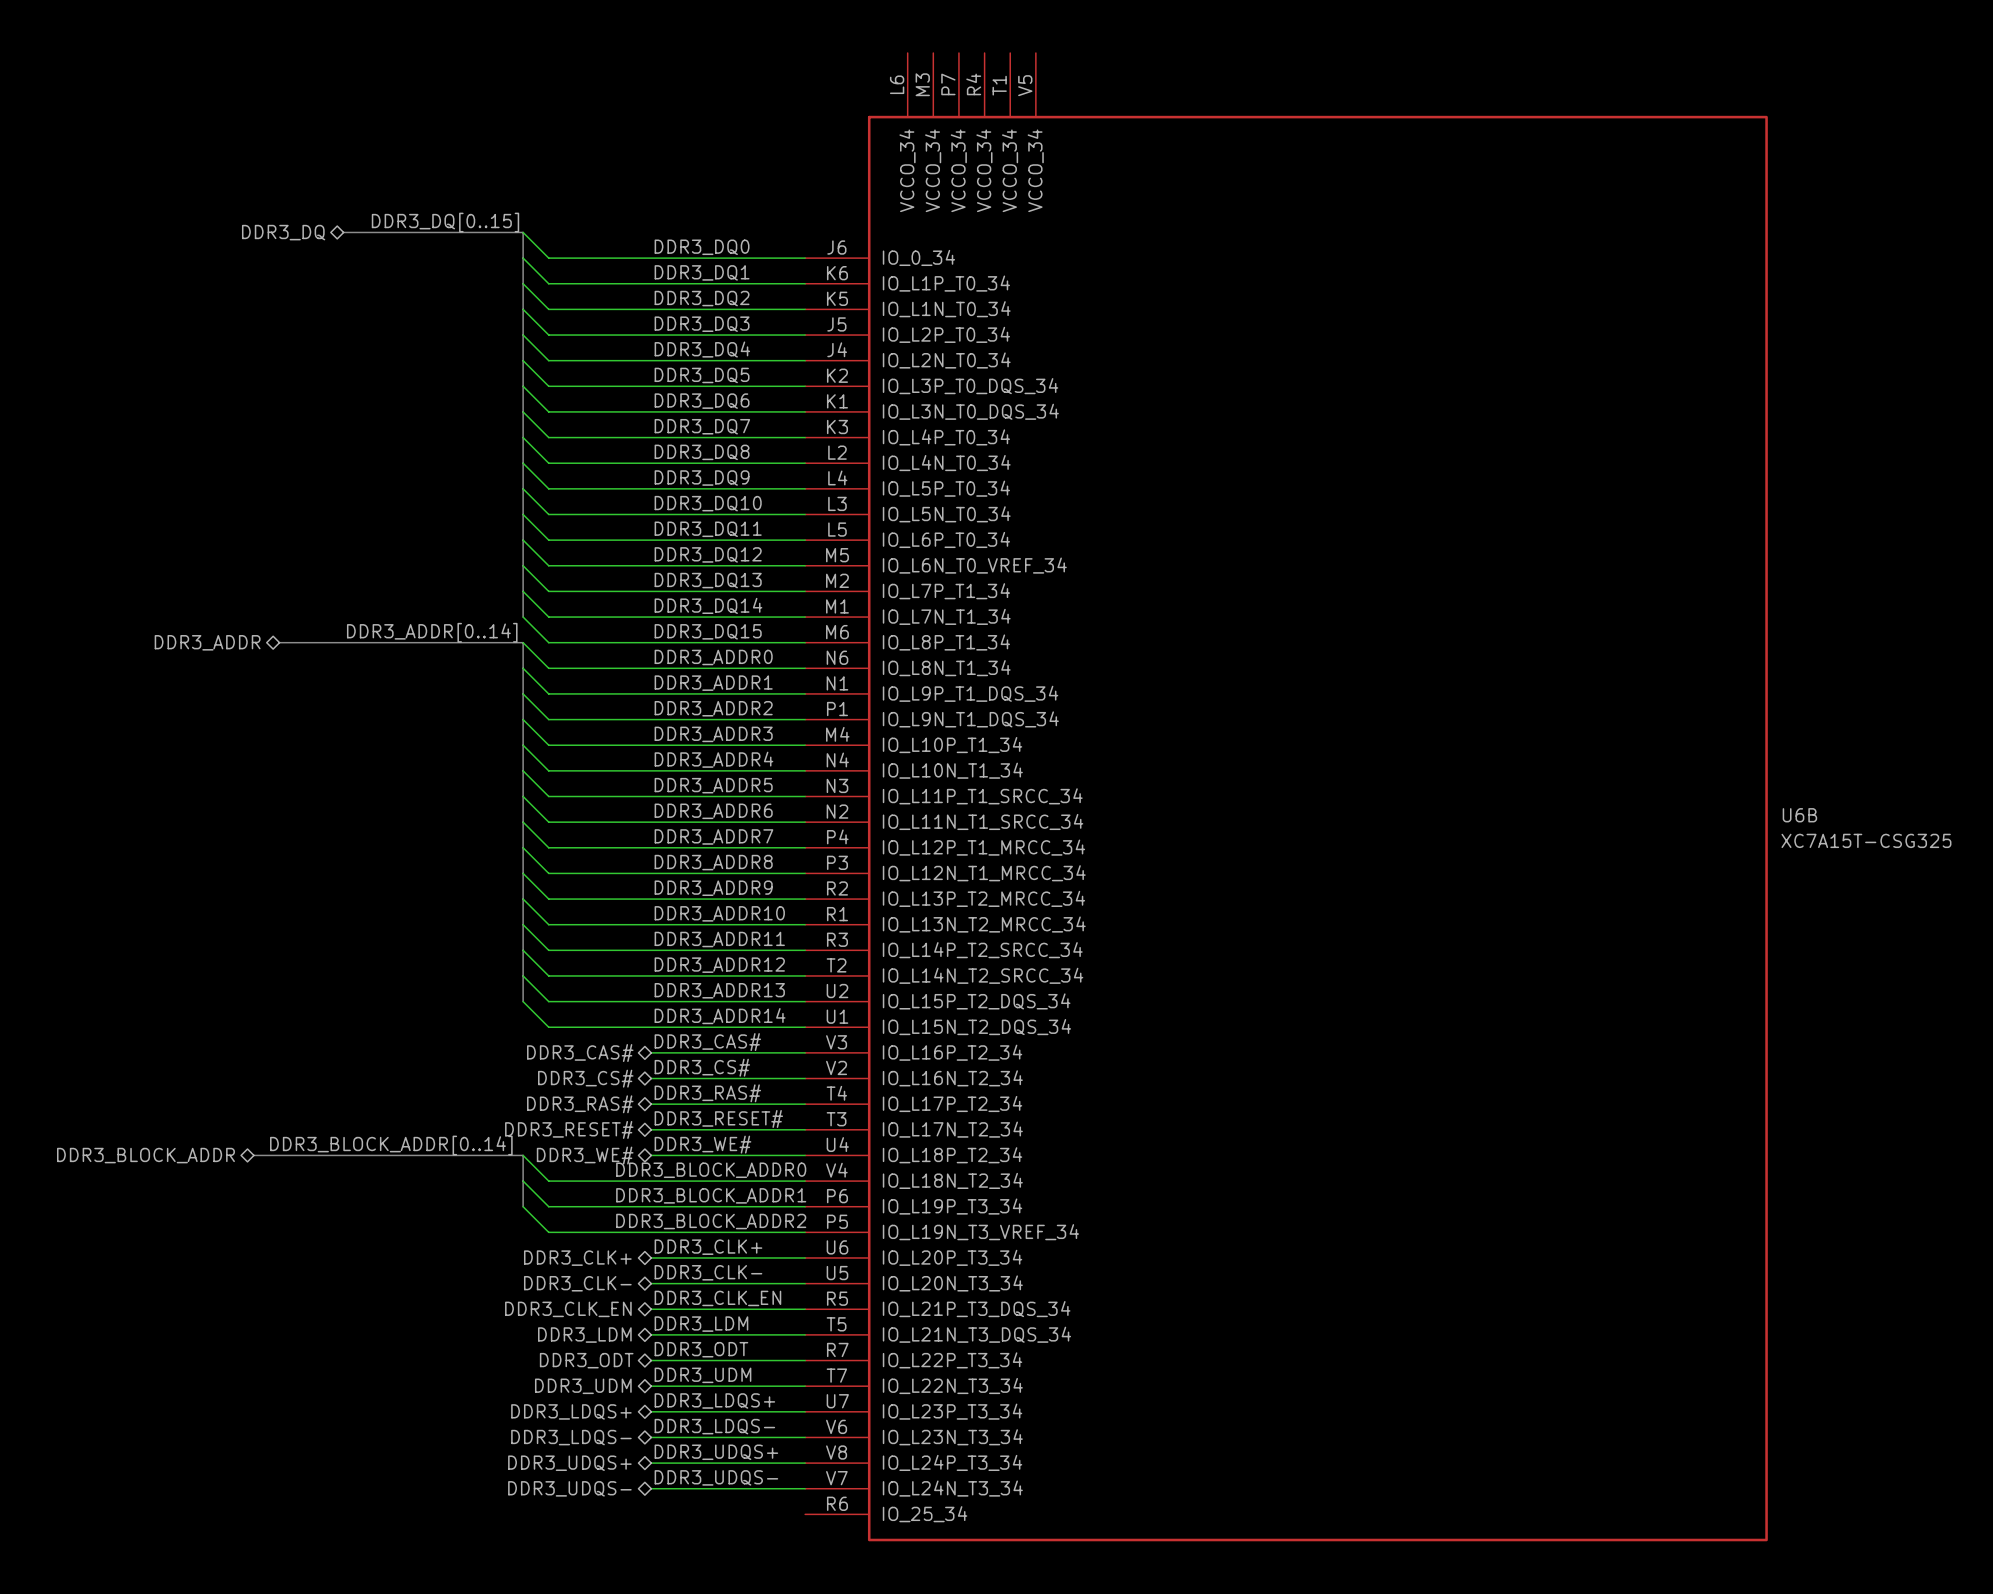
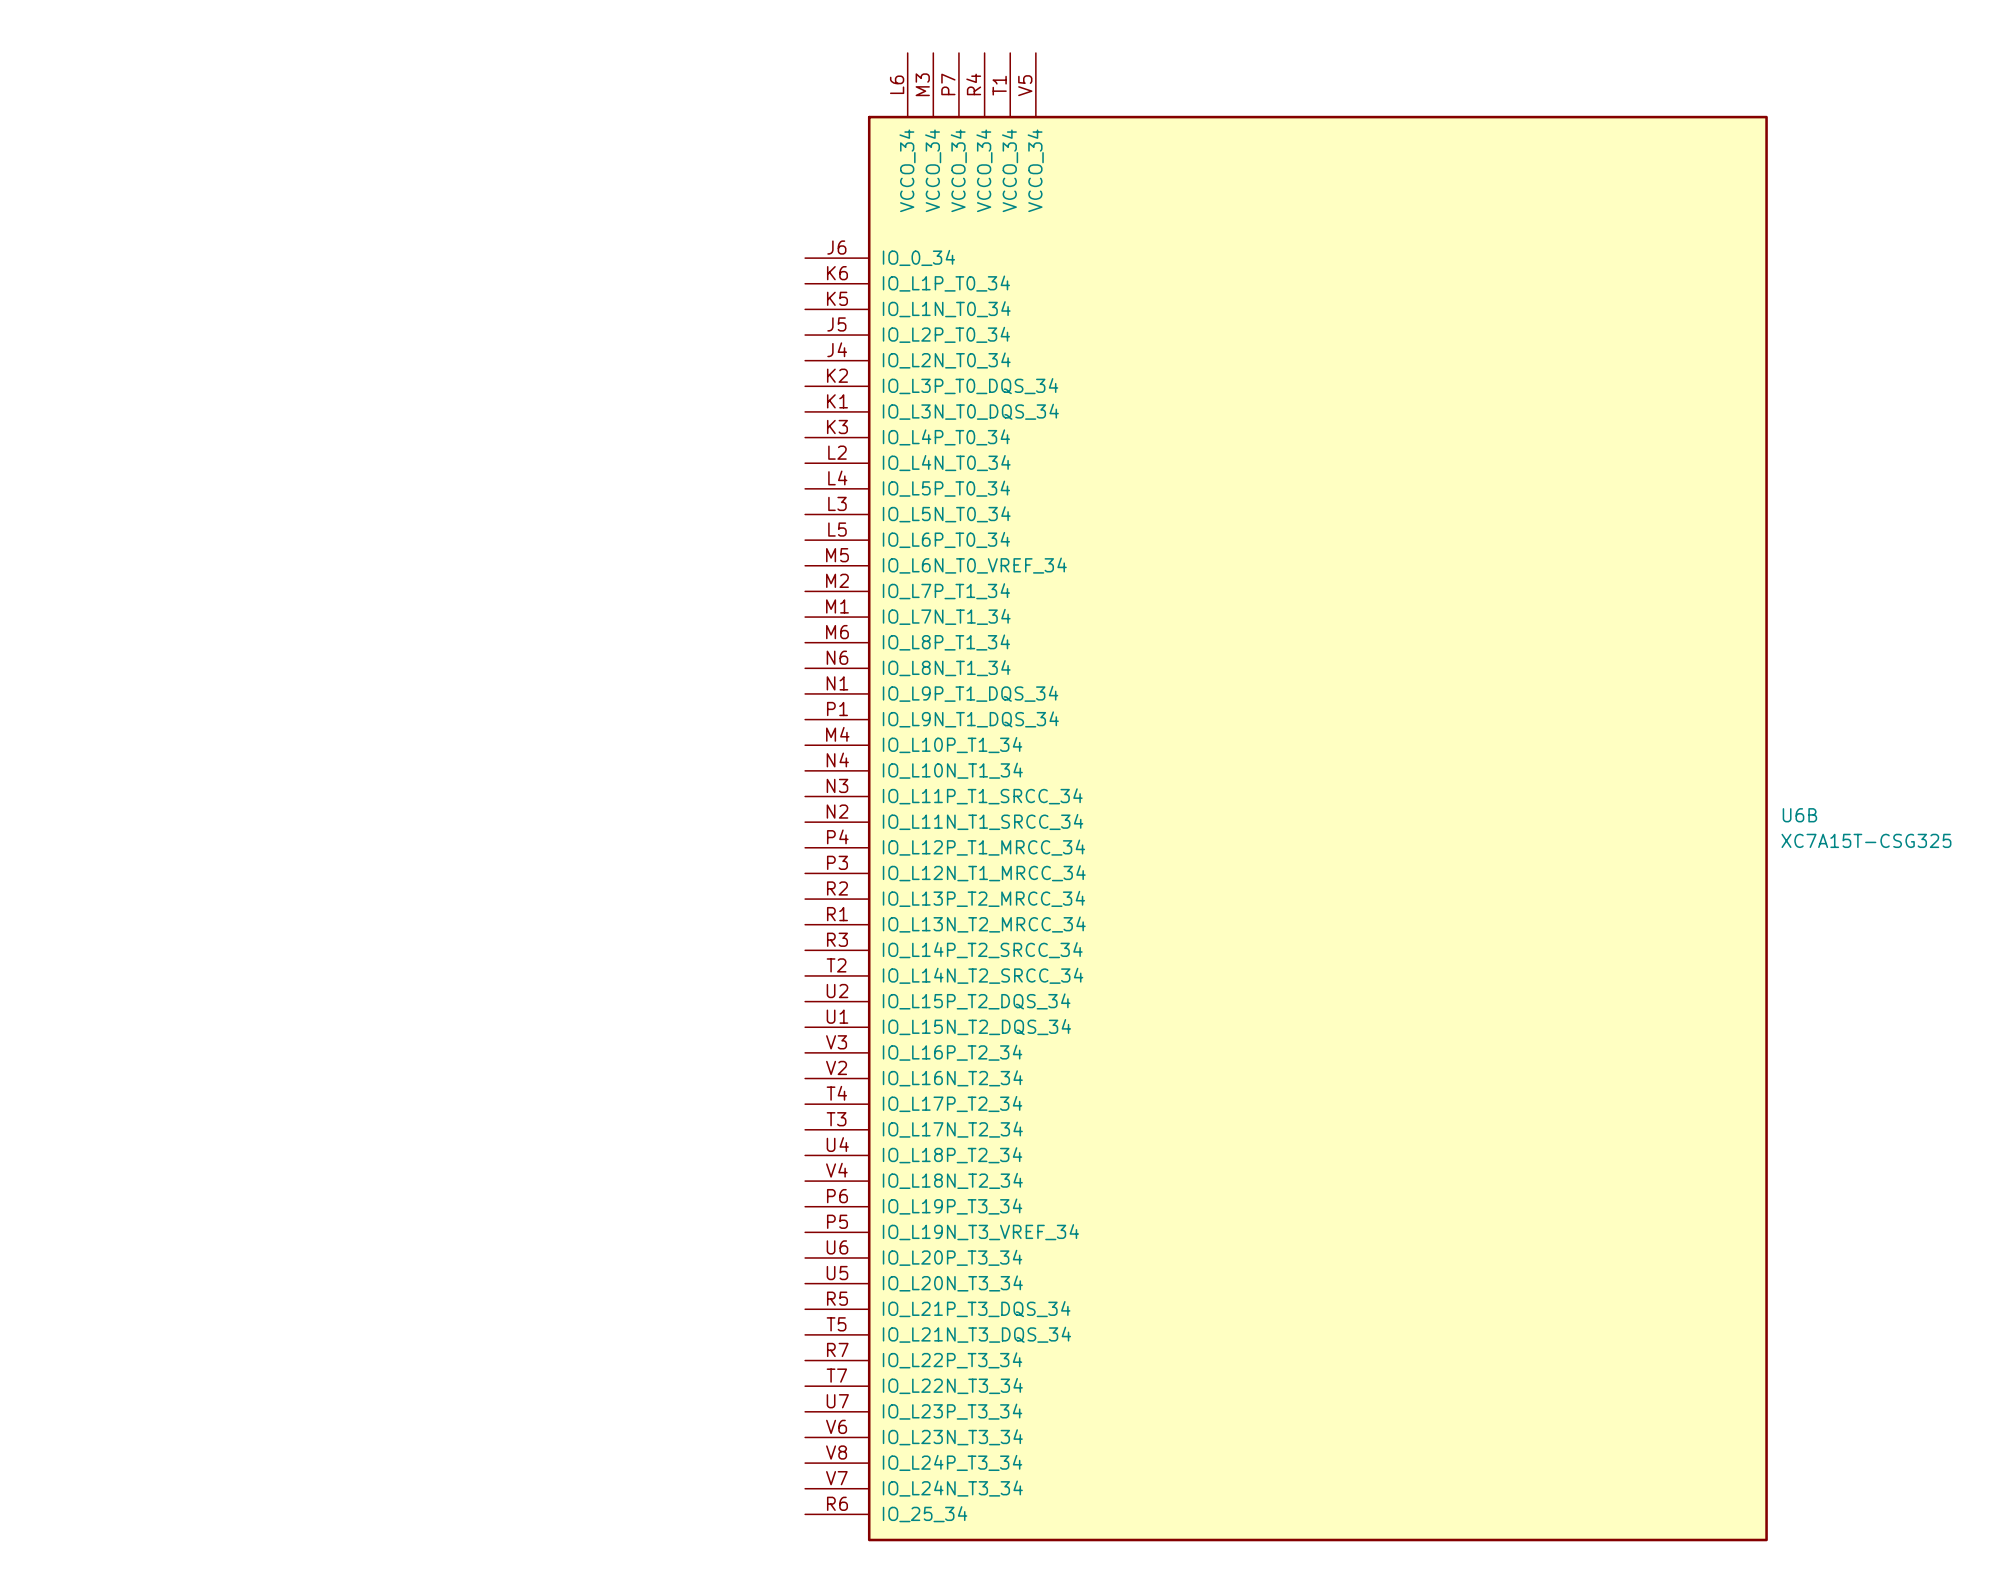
label: DDR3_DQ[0..15] (445, 222) -> none
hierarchical label: DDR3_DQ (283, 232) -> none
bus: (343, 232) (523, 232) (523, 617) -> none
wire: (523, 232) (548, 258) (805, 258) -> none
label: DDR3_DQ0 (702, 247) -> none
wire: (523, 258) (548, 283) (805, 283) -> none
label: DDR3_DQ1 (702, 272) -> none
wire: (523, 283) (548, 309) (805, 309) -> none
label: DDR3_DQ2 (702, 298) -> none
wire: (523, 309) (548, 335) (805, 335) -> none
label: DDR3_DQ3 (702, 324) -> none
wire: (523, 335) (548, 360) (805, 360) -> none
label: DDR3_DQ4 (702, 349) -> none
wire: (523, 360) (548, 386) (805, 386) -> none
label: DDR3_DQ5 (702, 375) -> none
wire: (523, 386) (548, 411) (805, 411) -> none
label: DDR3_DQ6 (702, 401) -> none
wire: (523, 411) (548, 437) (805, 437) -> none
label: DDR3_DQ7 (702, 426) -> none
wire: (523, 437) (548, 463) (805, 463) -> none
label: DDR3_DQ8 (702, 452) -> none
wire: (523, 463) (548, 488) (805, 488) -> none
label: DDR3_DQ9 (702, 478) -> none
wire: (523, 488) (548, 514) (805, 514) -> none
label: DDR3_DQ10 (708, 503) -> none
wire: (523, 514) (548, 540) (805, 540) -> none
label: DDR3_DQ11 (708, 529) -> none
wire: (523, 540) (548, 565) (805, 565) -> none
label: DDR3_DQ12 (708, 554) -> none
wire: (523, 565) (548, 591) (805, 591) -> none
label: DDR3_DQ13 (708, 580) -> none
wire: (523, 591) (548, 617) (805, 617) -> none
label: DDR3_DQ14 (708, 605) -> none
wire: (523, 617) (548, 642) (805, 642) -> none
label: DDR3_DQ15 (708, 631) -> none
label: DDR3_ADDR[0..14] (432, 632) -> none
hierarchical label: DDR3_ADDR (207, 642) -> none
bus: (279, 642) (523, 642) (523, 1001) -> none
wire: (523, 642) (548, 668) (805, 668) -> none
label: DDR3_ADDR0 (713, 657) -> none
wire: (523, 668) (548, 693) (805, 693) -> none
label: DDR3_ADDR1 (713, 683) -> none
wire: (523, 693) (548, 719) (805, 719) -> none
label: DDR3_ADDR2 (713, 708) -> none
wire: (523, 719) (548, 745) (805, 745) -> none
label: DDR3_ADDR3 (713, 734) -> none
wire: (523, 745) (548, 770) (805, 770) -> none
label: DDR3_ADDR4 (713, 759) -> none
wire: (523, 770) (548, 796) (805, 796) -> none
label: DDR3_ADDR5 (713, 785) -> none
wire: (523, 796) (548, 822) (805, 822) -> none
label: DDR3_ADDR6 (713, 811) -> none
wire: (523, 822) (548, 847) (805, 847) -> none
label: DDR3_ADDR7 (713, 836) -> none
wire: (523, 847) (548, 873) (805, 873) -> none
label: DDR3_ADDR8 (713, 862) -> none
wire: (523, 873) (548, 899) (805, 899) -> none
label: DDR3_ADDR9 (713, 888) -> none
wire: (523, 899) (548, 924) (805, 924) -> none
label: DDR3_ADDR10 (719, 913) -> none
wire: (523, 924) (548, 950) (805, 950) -> none
label: DDR3_ADDR11 (719, 939) -> none
wire: (523, 950) (548, 975) (805, 975) -> none
label: DDR3_ADDR12 (719, 965) -> none
wire: (523, 975) (548, 1001) (805, 1001) -> none
label: DDR3_ADDR13 (719, 990) -> none
wire: (523, 1001) (548, 1027) (805, 1027) -> none
label: DDR3_ADDR14 (720, 1016) -> none
label: DDR3_CAS# (707, 1042) -> none
wire: (651, 1052) (805, 1052) -> none
hierarchical label: DDR3_CAS# (580, 1053) -> none
label: DDR3_CS# (702, 1067) -> none
hierarchical label: DDR3_CS# (585, 1078) -> none
wire: (651, 1078) (805, 1078) -> none
label: DDR3_RAS# (707, 1093) -> none
hierarchical label: DDR3_RAS# (580, 1104) -> none
wire: (651, 1104) (805, 1104) -> none
label: DDR3_RESET# (718, 1118) -> none
hierarchical label: DDR3_RESET# (569, 1129) -> none
wire: (651, 1129) (805, 1129) -> none
label: DDR3_WE# (702, 1144) -> none
label: DDR3_BLOCK_ADDR[0..14] (391, 1145) -> none
hierarchical label: DDR3_BLOCK_ADDR (145, 1155) -> none
bus: (253, 1155) (523, 1155) (523, 1206) -> none
wire: (523, 1155) (548, 1181) (805, 1181) -> none
hierarchical label: DDR3_WE# (585, 1155) -> none
wire: (651, 1155) (805, 1155) -> none
label: DDR3_BLOCK_ADDR0 (711, 1170) -> none
wire: (523, 1181) (548, 1206) (805, 1206) -> none
label: DDR3_BLOCK_ADDR1 (711, 1195) -> none
wire: (523, 1206) (548, 1232) (805, 1232) -> none
label: DDR3_BLOCK_ADDR2 (711, 1221) -> none
label: DDR3_CLK+ (708, 1247) -> none
wire: (651, 1257) (805, 1257) -> none
hierarchical label: DDR3_CLK+ (577, 1258) -> none
label: DDR3_CLK- (708, 1272) -> none
hierarchical label: DDR3_CLK- (577, 1283) -> none
wire: (651, 1283) (805, 1283) -> none
label: DDR3_CLK_EN (717, 1298) -> none
hierarchical label: DDR3_CLK_EN (568, 1309) -> none
wire: (651, 1309) (805, 1309) -> none
label: DDR3_LDM (701, 1324) -> none
wire: (651, 1334) (805, 1334) -> none
hierarchical label: DDR3_LDM (584, 1335) -> none
label: DDR3_ODT (701, 1349) -> none
hierarchical label: DDR3_ODT (586, 1360) -> none
wire: (651, 1360) (805, 1360) -> none
label: DDR3_UDM (702, 1375) -> none
hierarchical label: DDR3_UDM (583, 1386) -> none
wire: (651, 1386) (805, 1386) -> none
label: DDR3_LDQS+ (714, 1400) -> none
hierarchical label: DDR3_LDQS+ (571, 1411) -> none
wire: (651, 1411) (805, 1411) -> none
label: DDR3_LDQS- (714, 1426) -> none
hierarchical label: DDR3_LDQS- (571, 1437) -> none
wire: (651, 1437) (805, 1437) -> none
label: DDR3_UDQS+ (716, 1452) -> none
hierarchical label: DDR3_UDQS+ (569, 1463) -> none
wire: (651, 1463) (805, 1463) -> none
label: DDR3_UDQS- (716, 1477) -> none
hierarchical label: DDR3_UDQS- (569, 1488) -> none
wire: (651, 1488) (805, 1488) -> none

